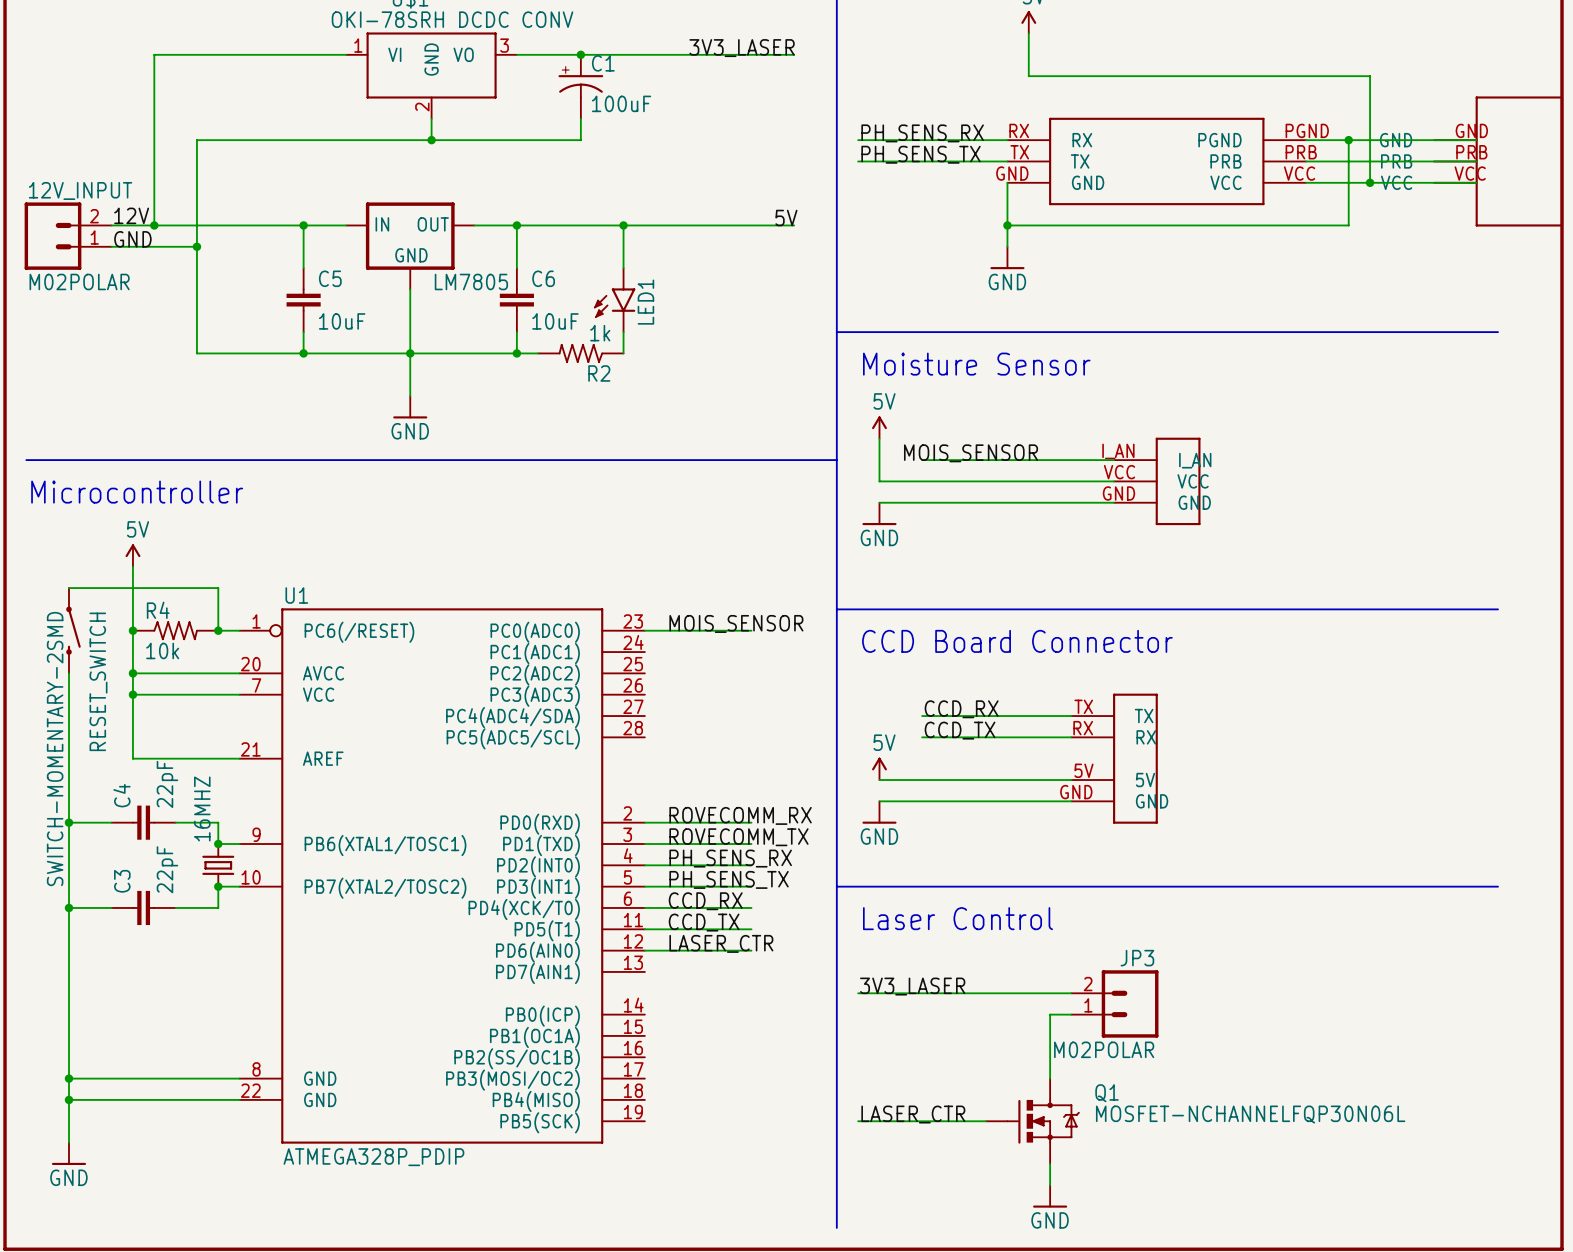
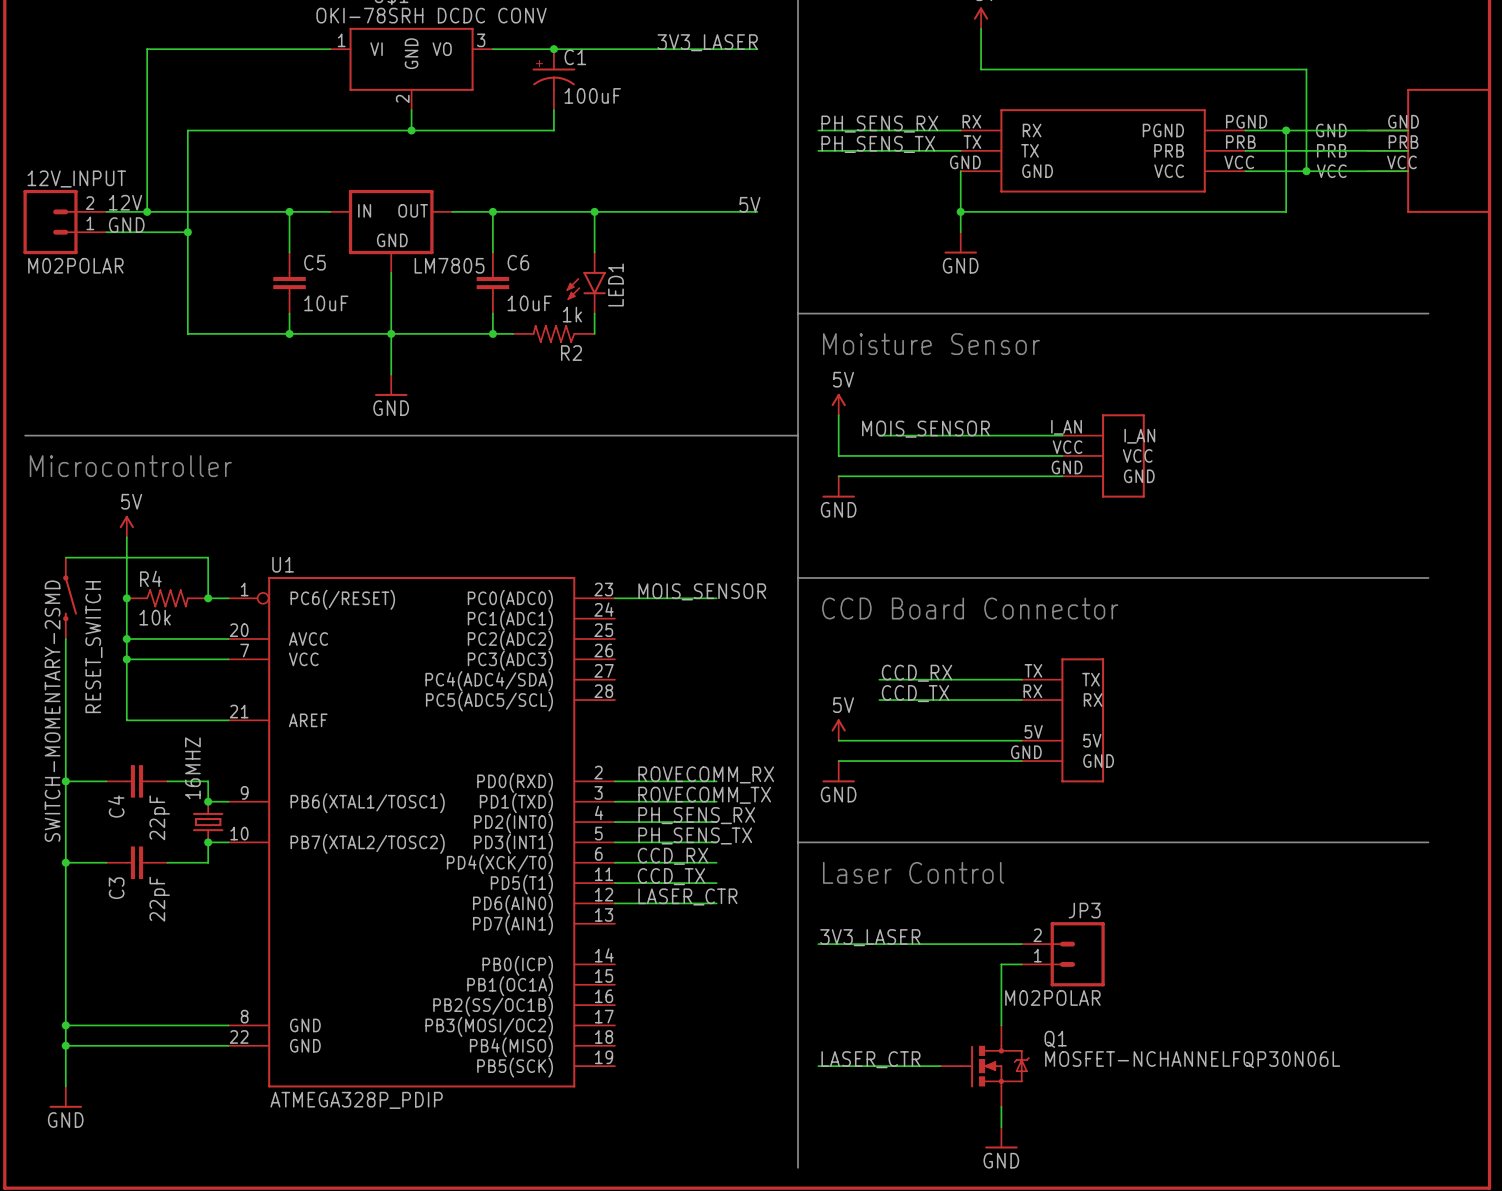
C4 value position: 22pF (167, 784) -> 22pF (159, 817)
C4 name position: C4 (121, 795) -> C4 (116, 806)
C3 value position: 22pF (167, 869) -> 22pF (159, 899)
C3 name position: C3 (122, 881) -> C3 (116, 888)

